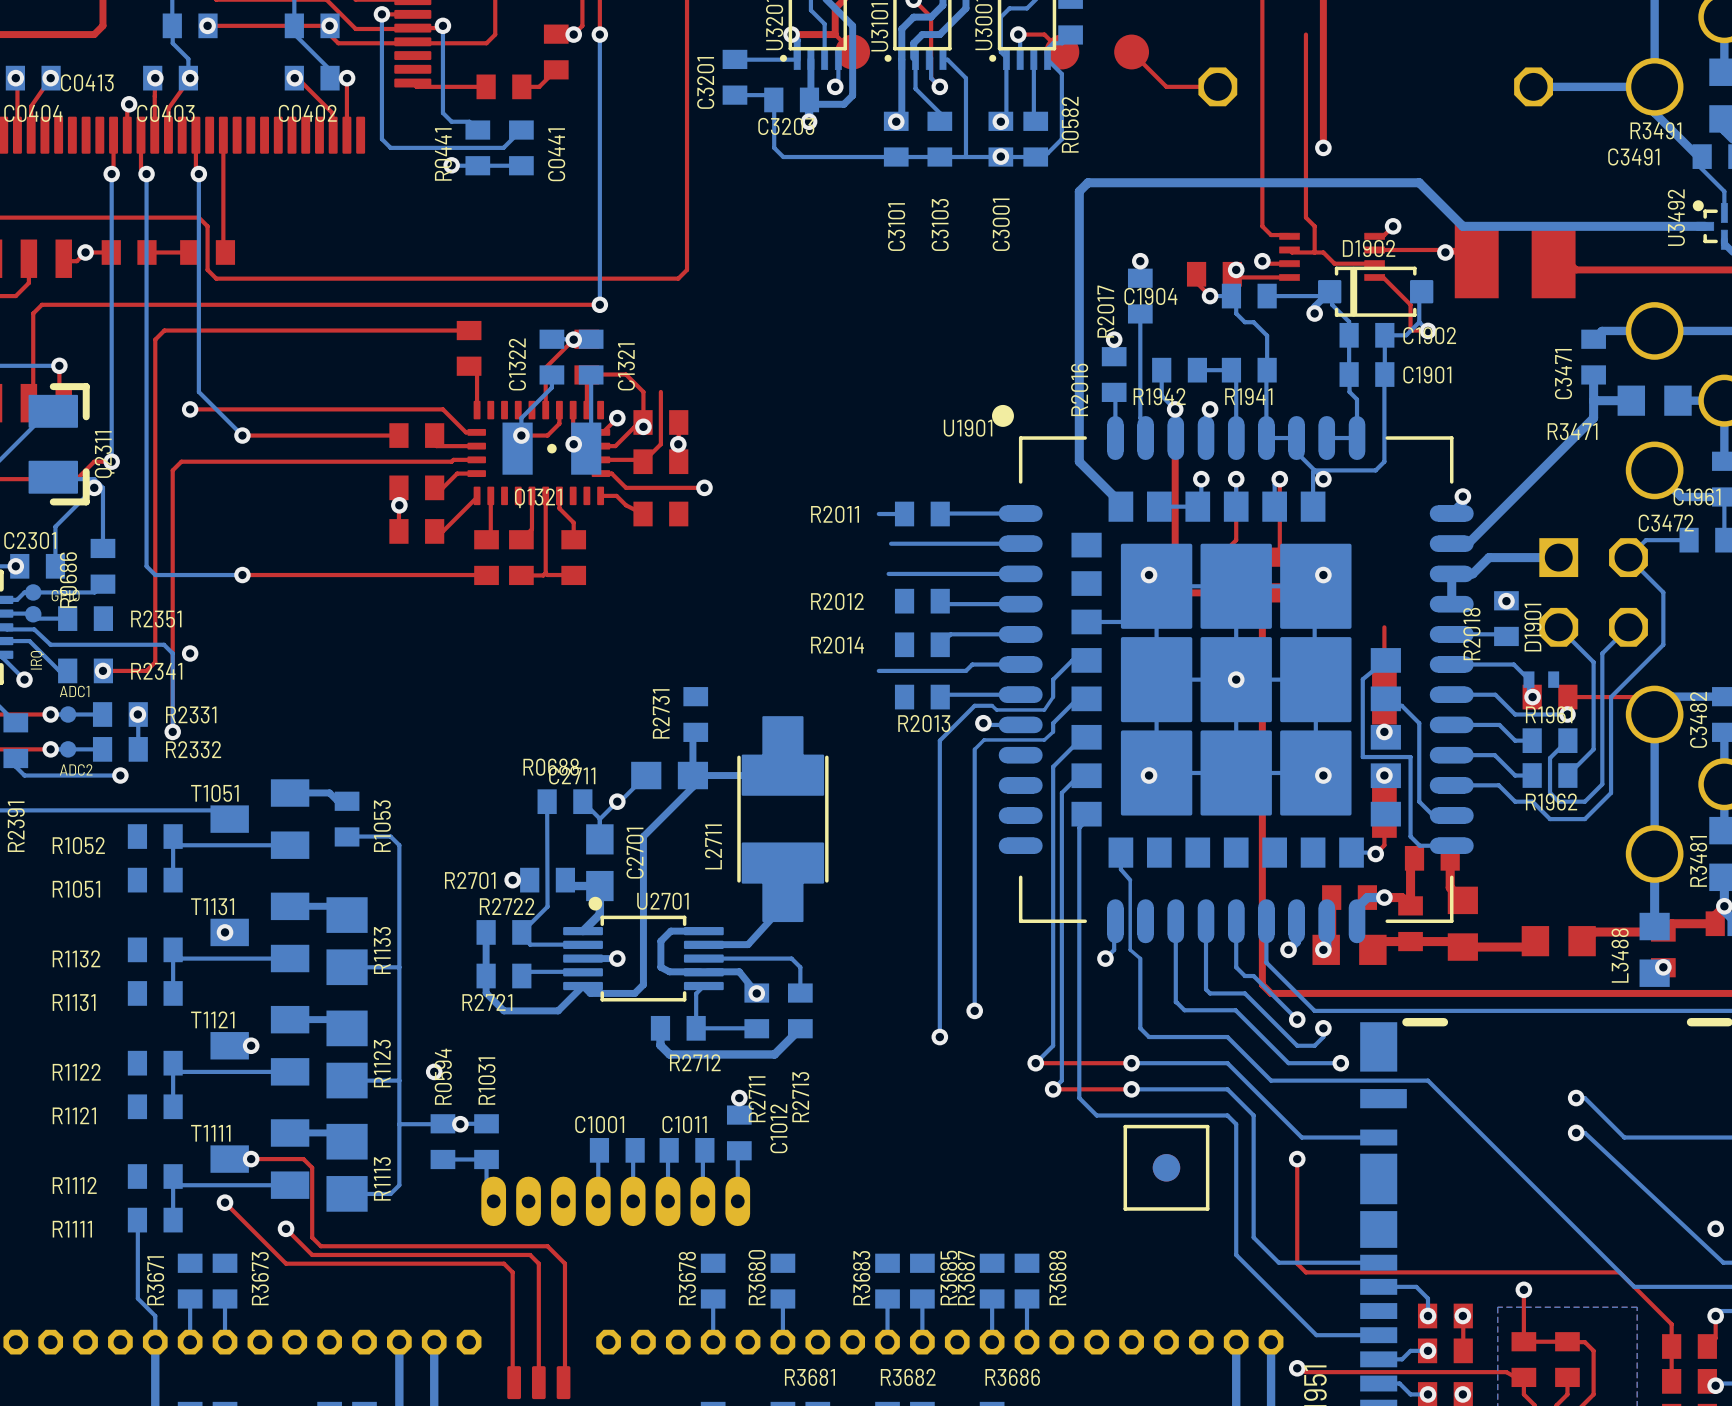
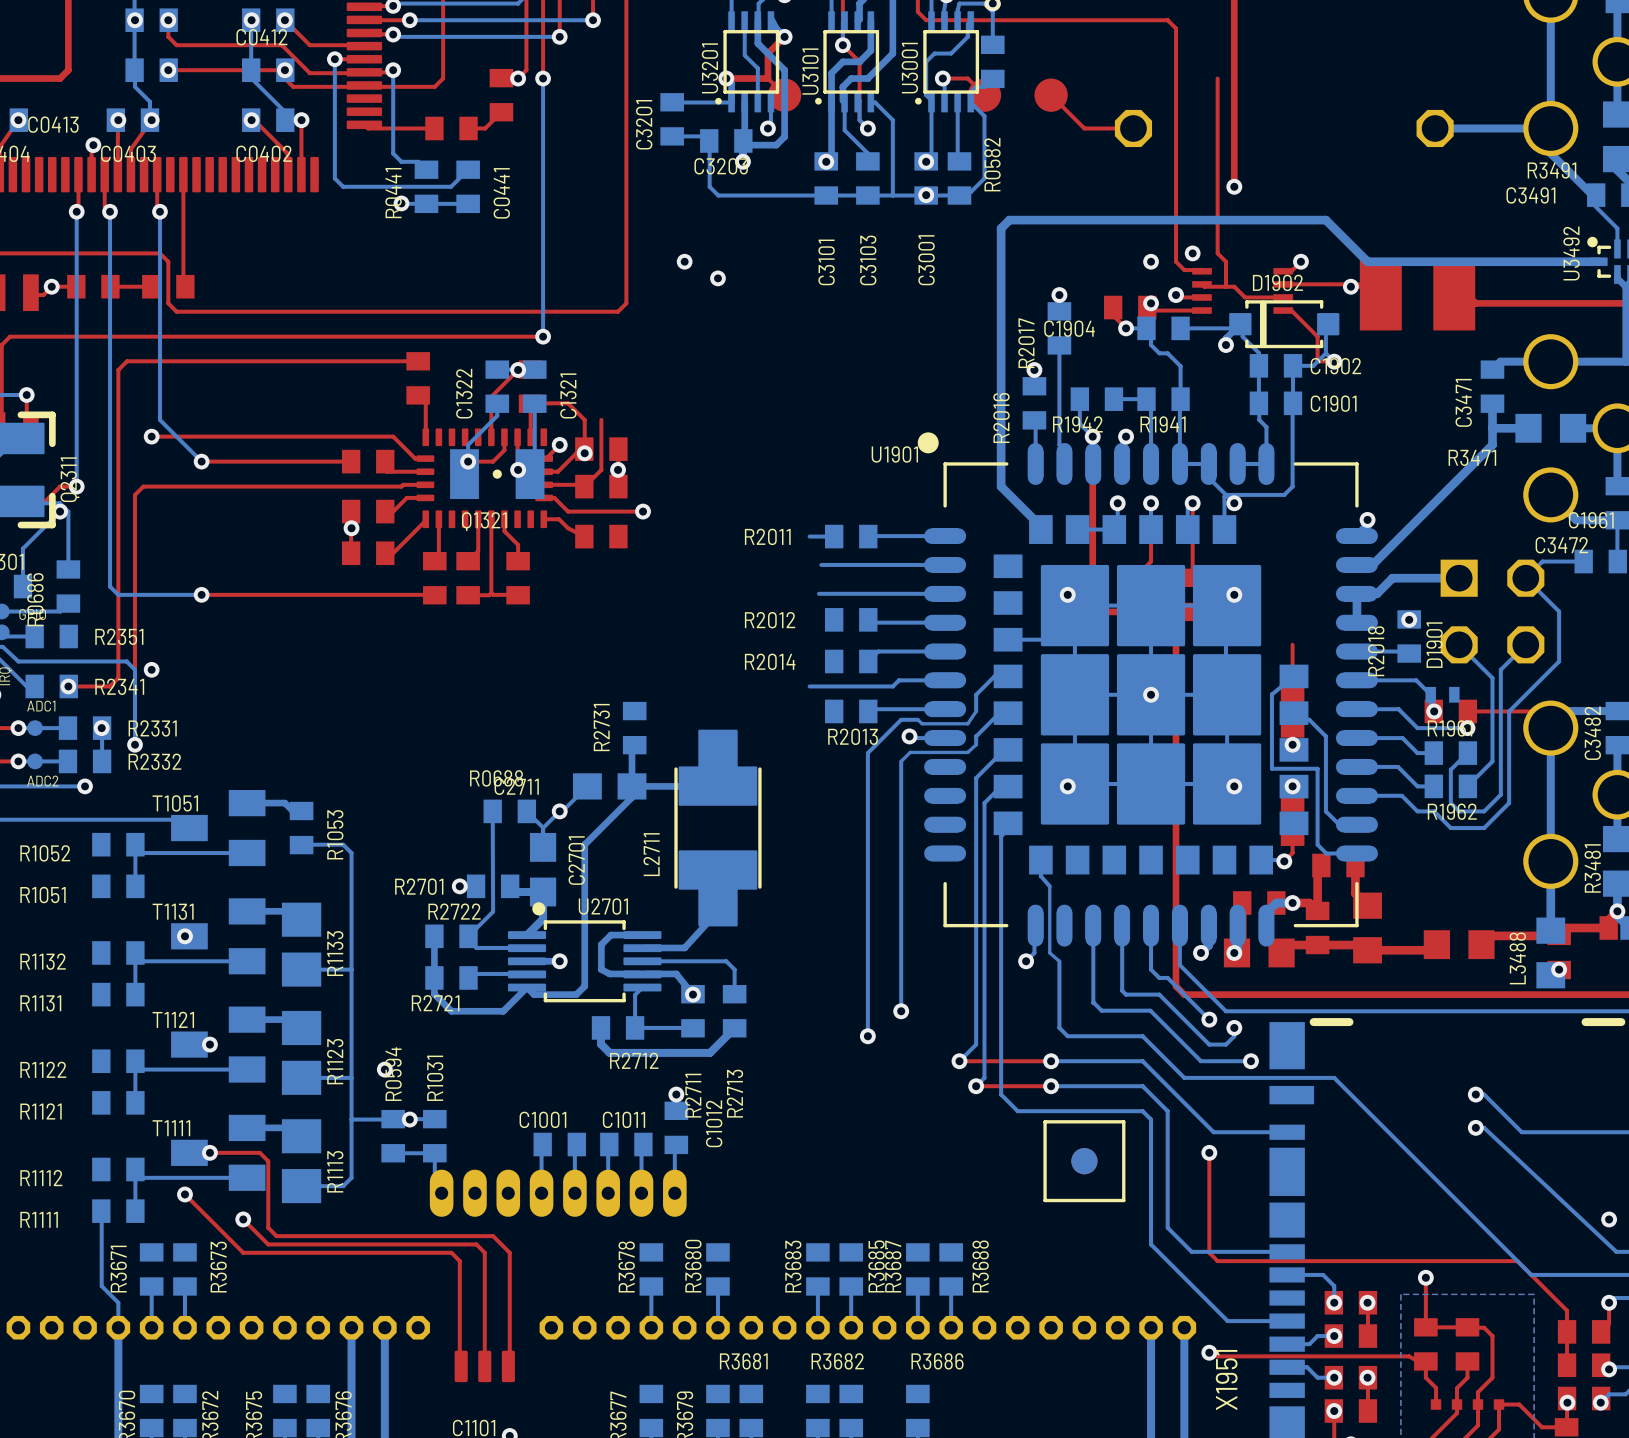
via: none -> (1192, 253)
via: none -> (684, 261)
via: none -> (1151, 261)
via: none -> (717, 278)

